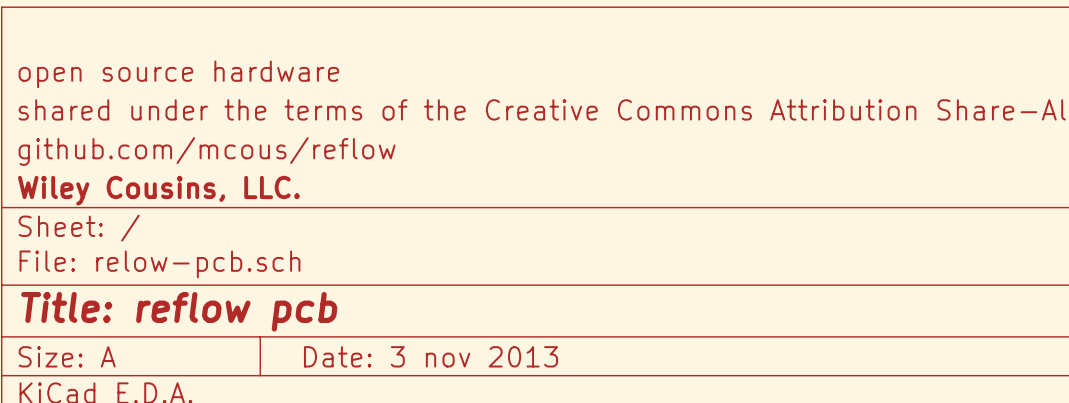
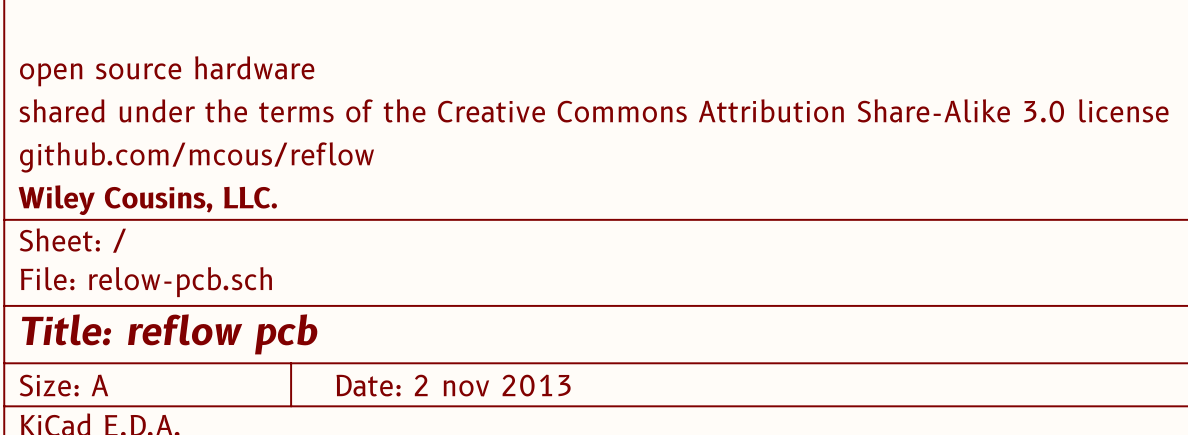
title block: Date: 3 nov 2013 (431, 356) -> Date: 2 nov 2013 (453, 385)

